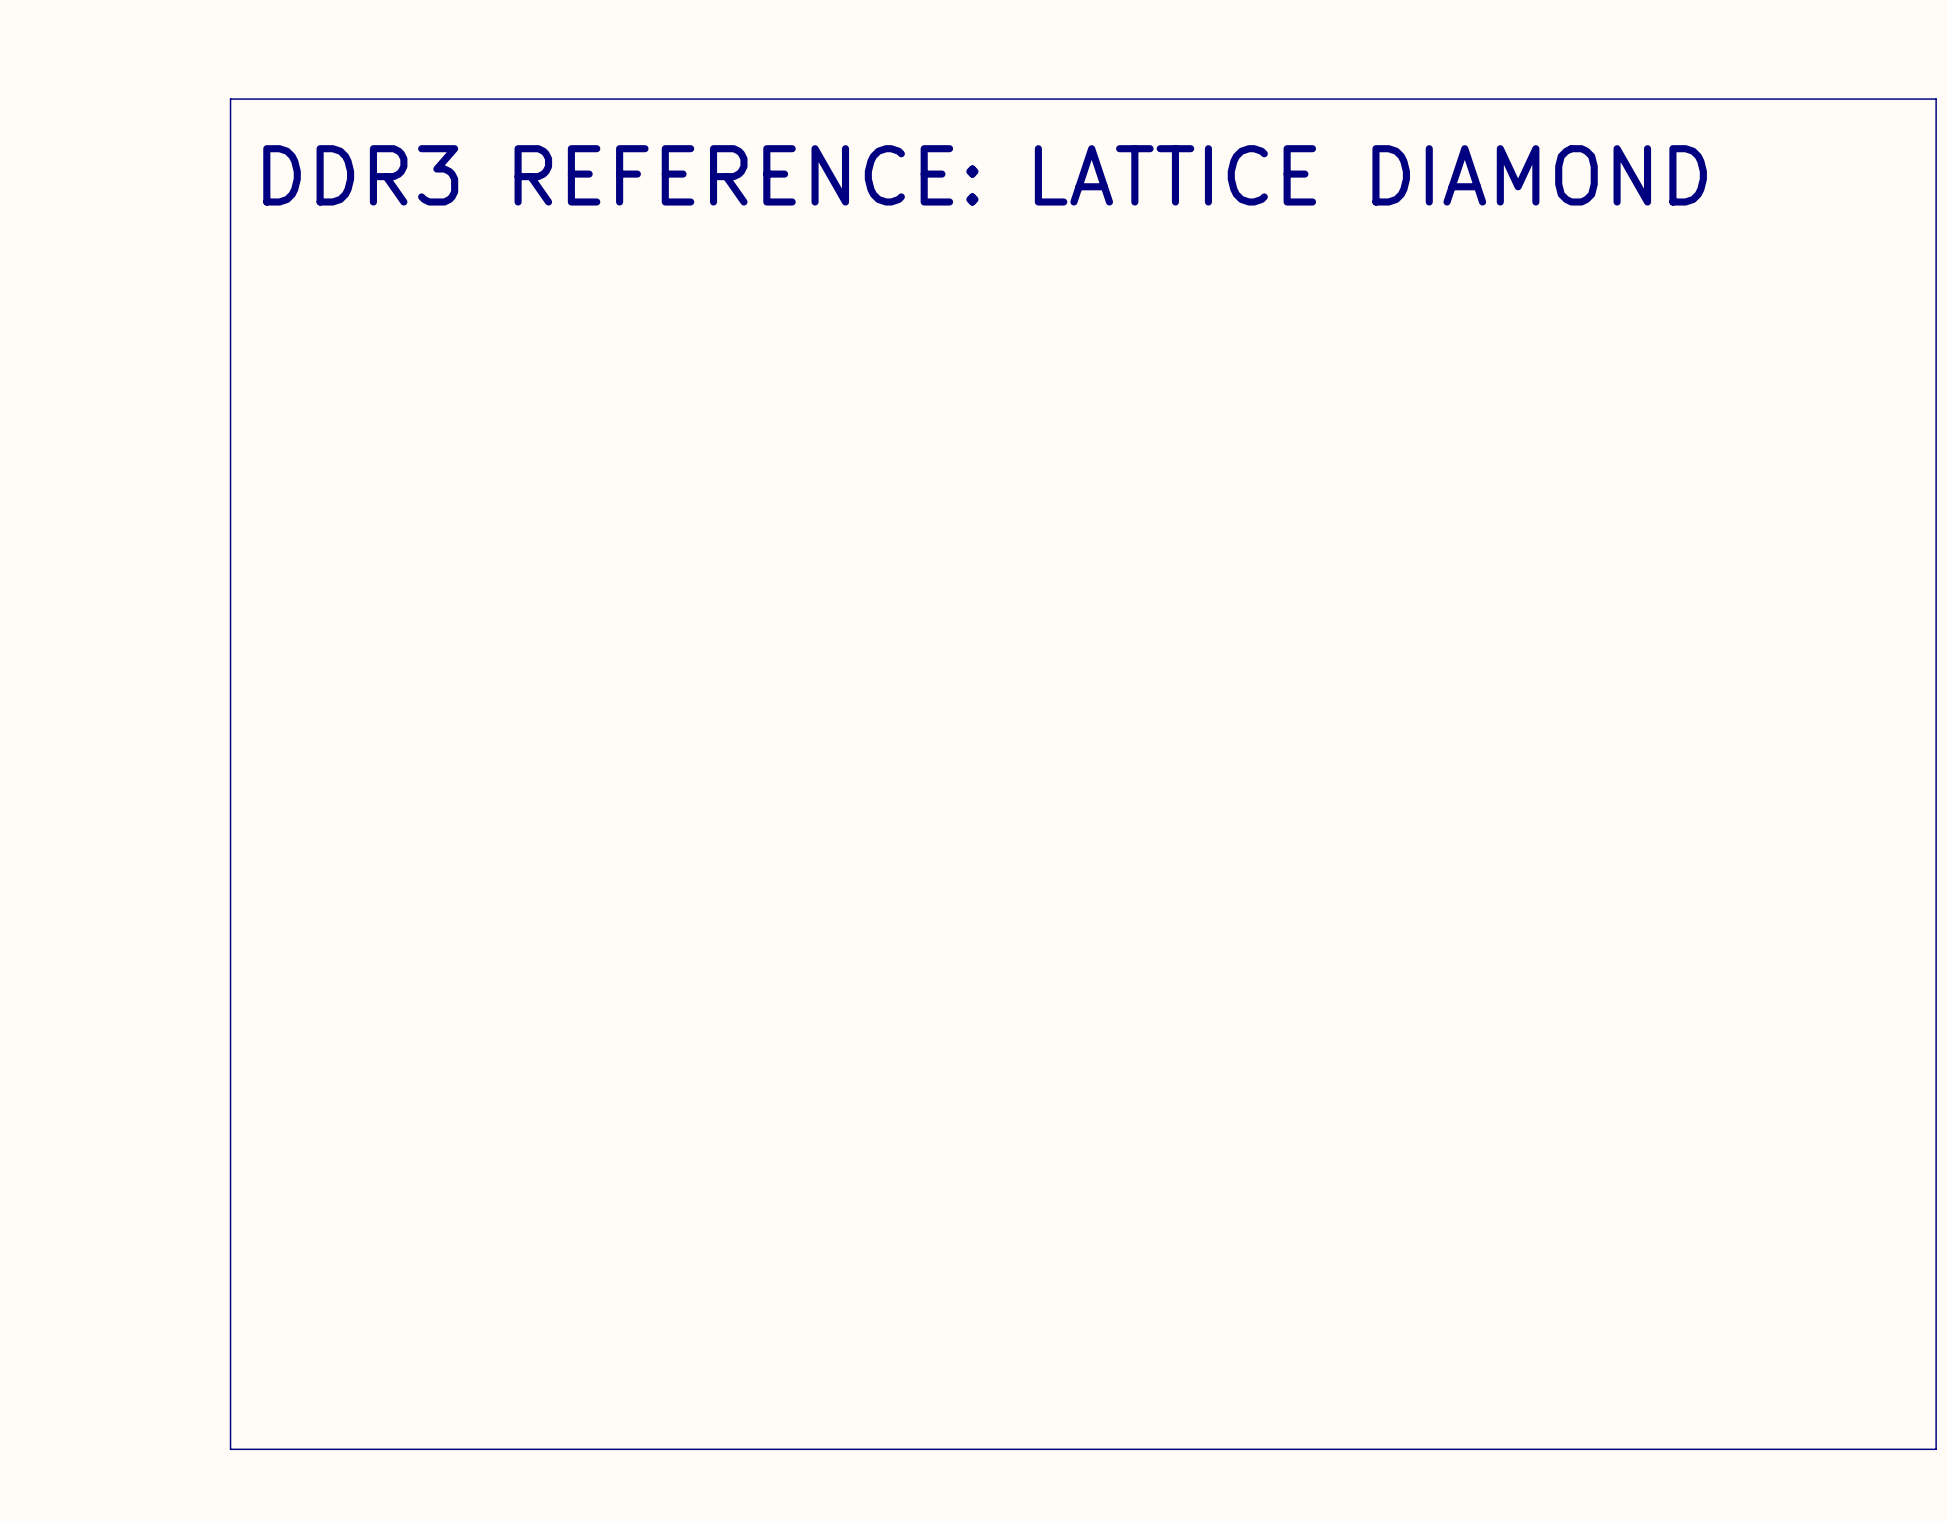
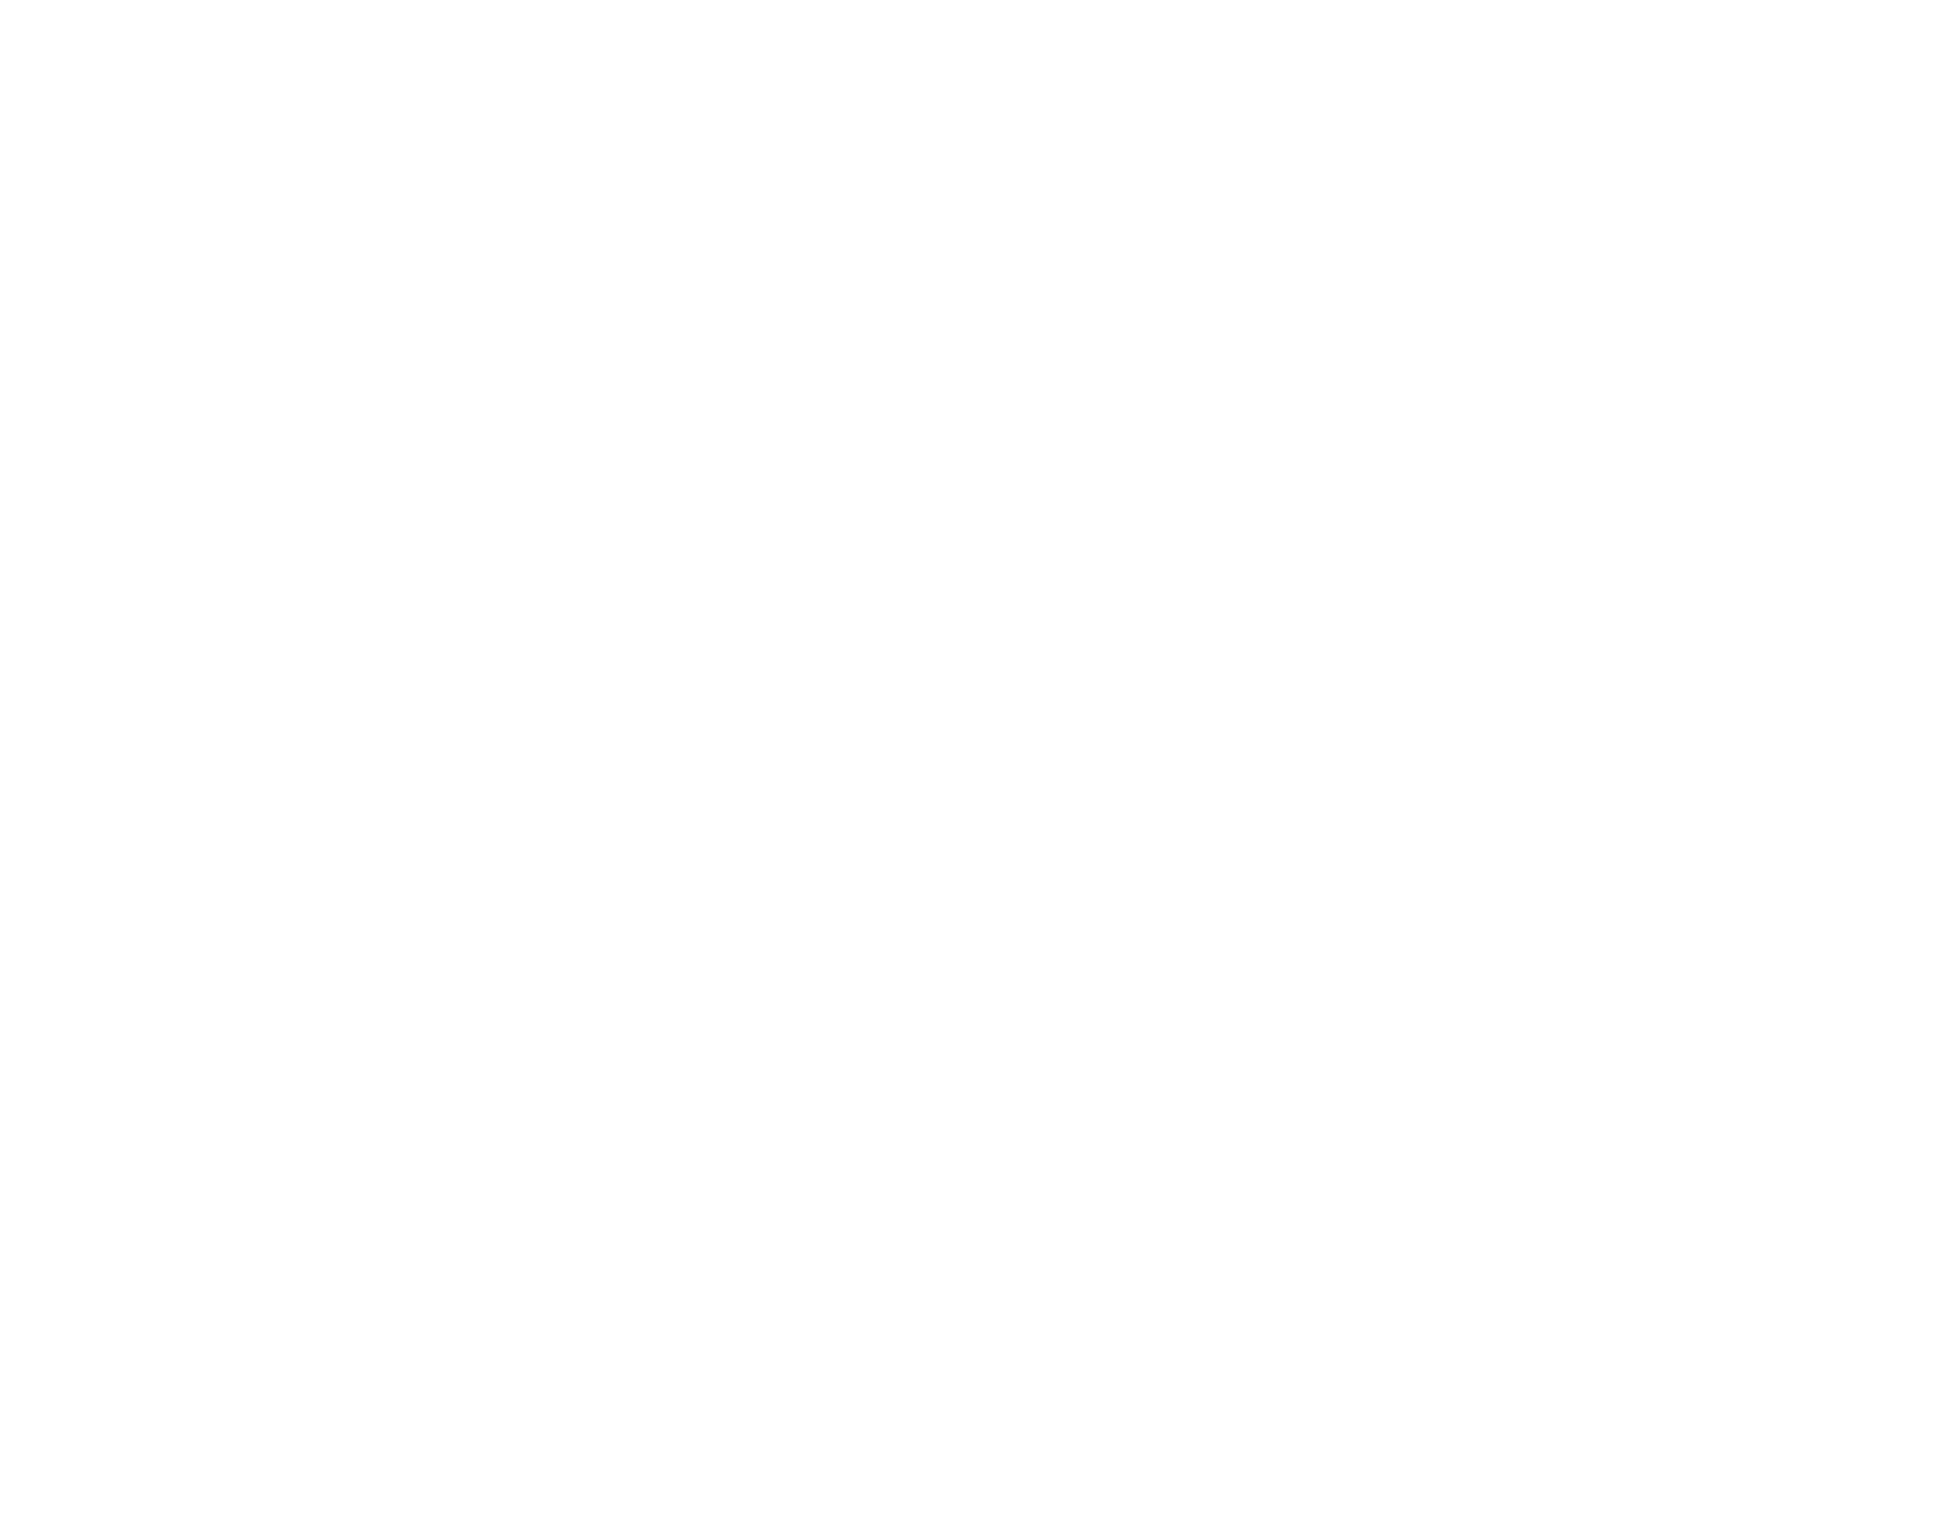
line: (230, 99) (1936, 99) (1936, 1449) (230, 1449) (230, 99) -> none
text: DDR3 REFERENCE: LATTICE DIAMOND (985, 175) -> none

